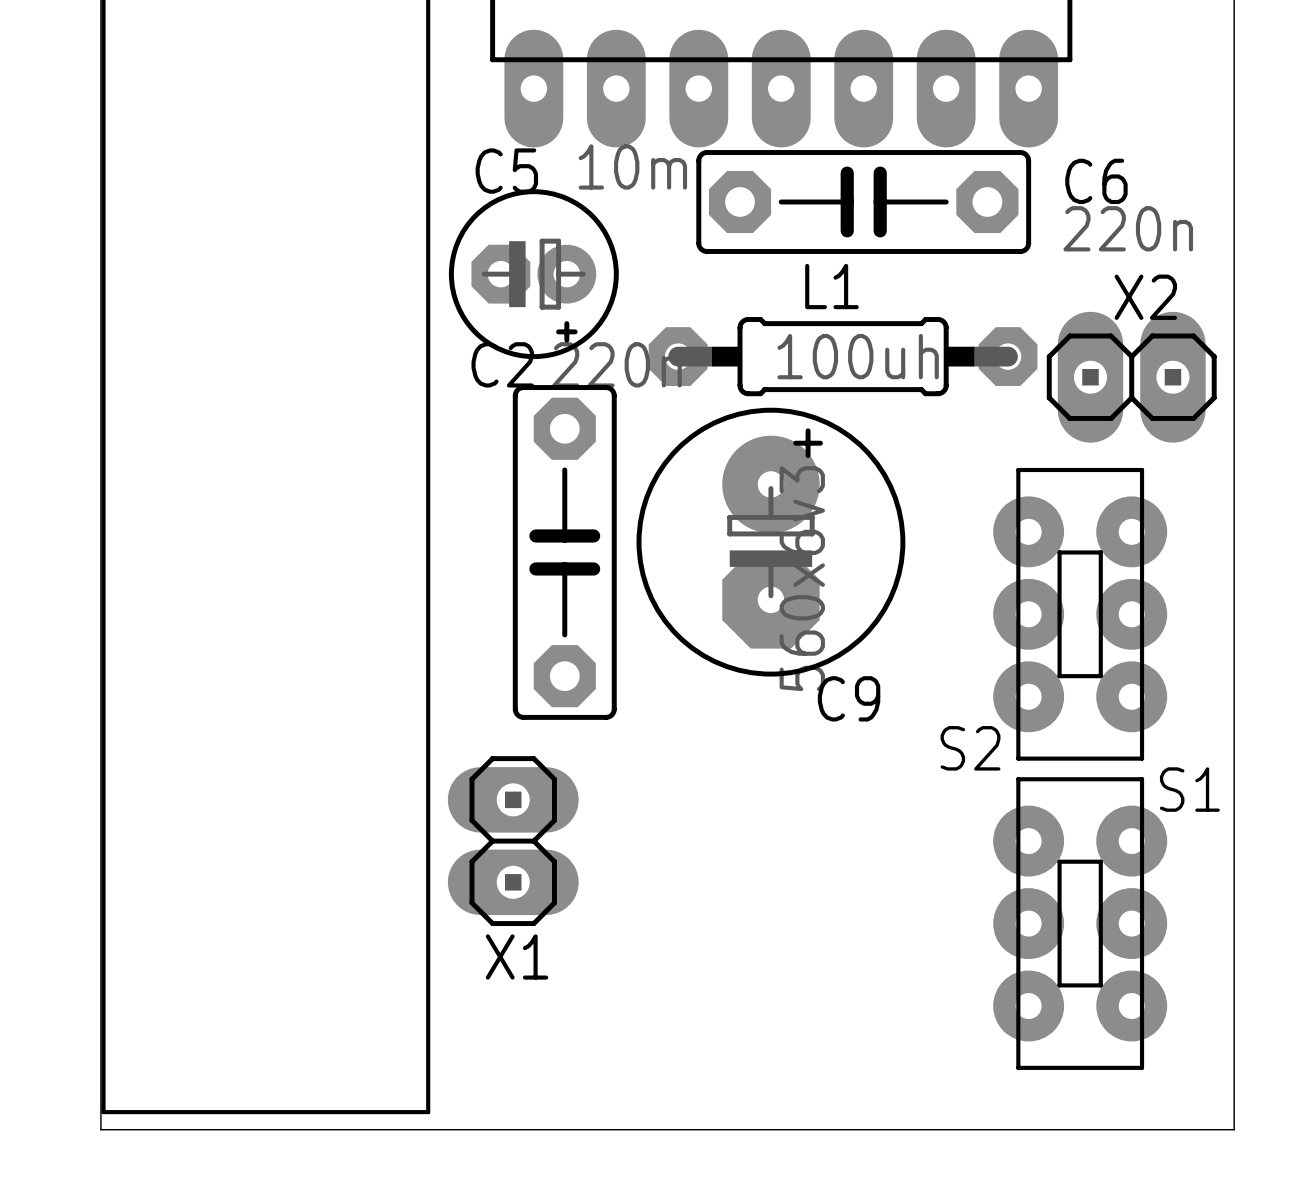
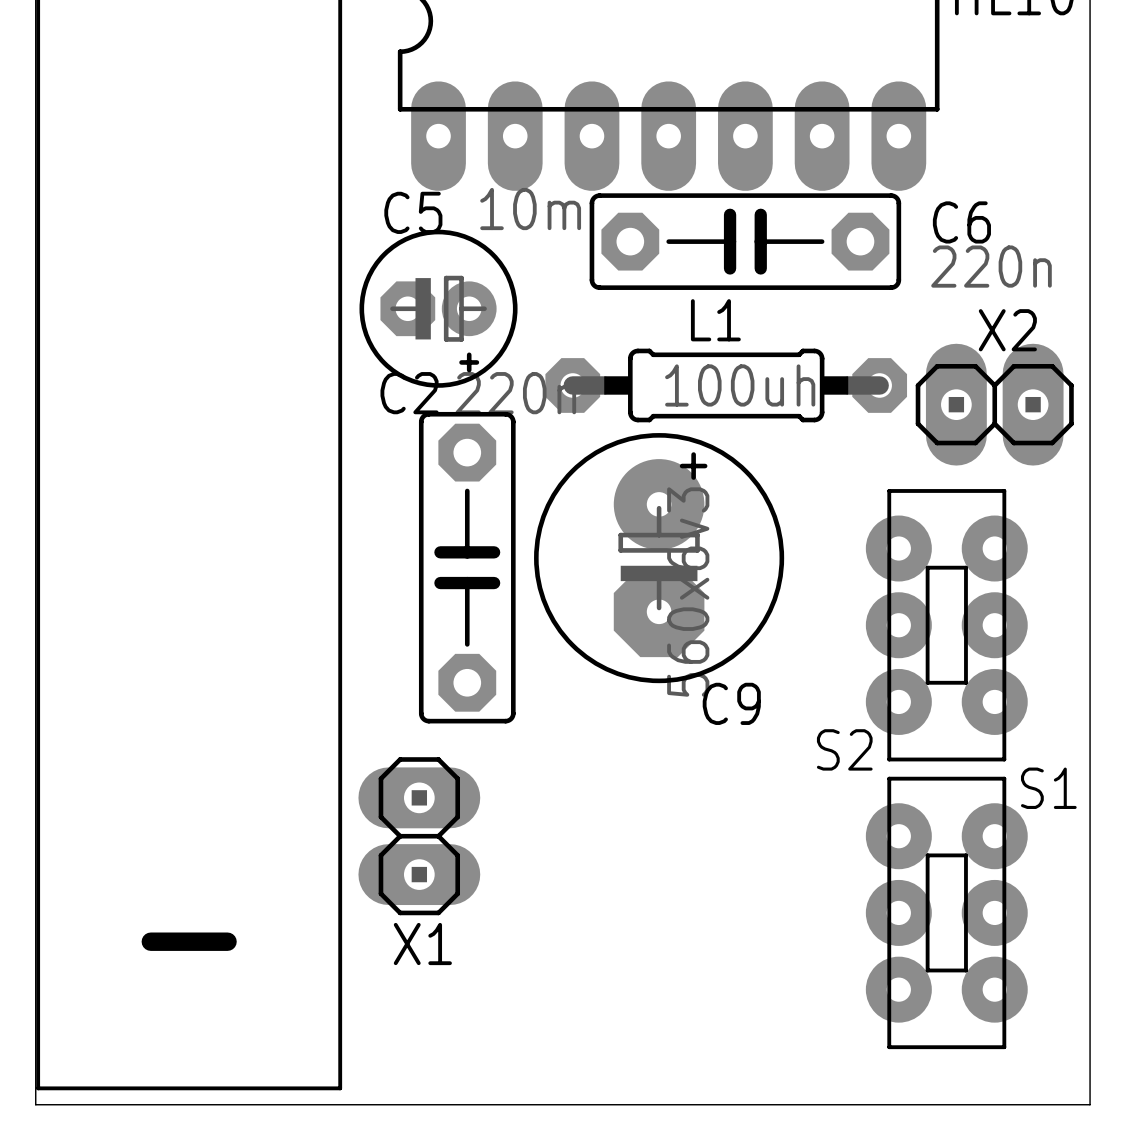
line: none -> (150, 941) (227, 941)

